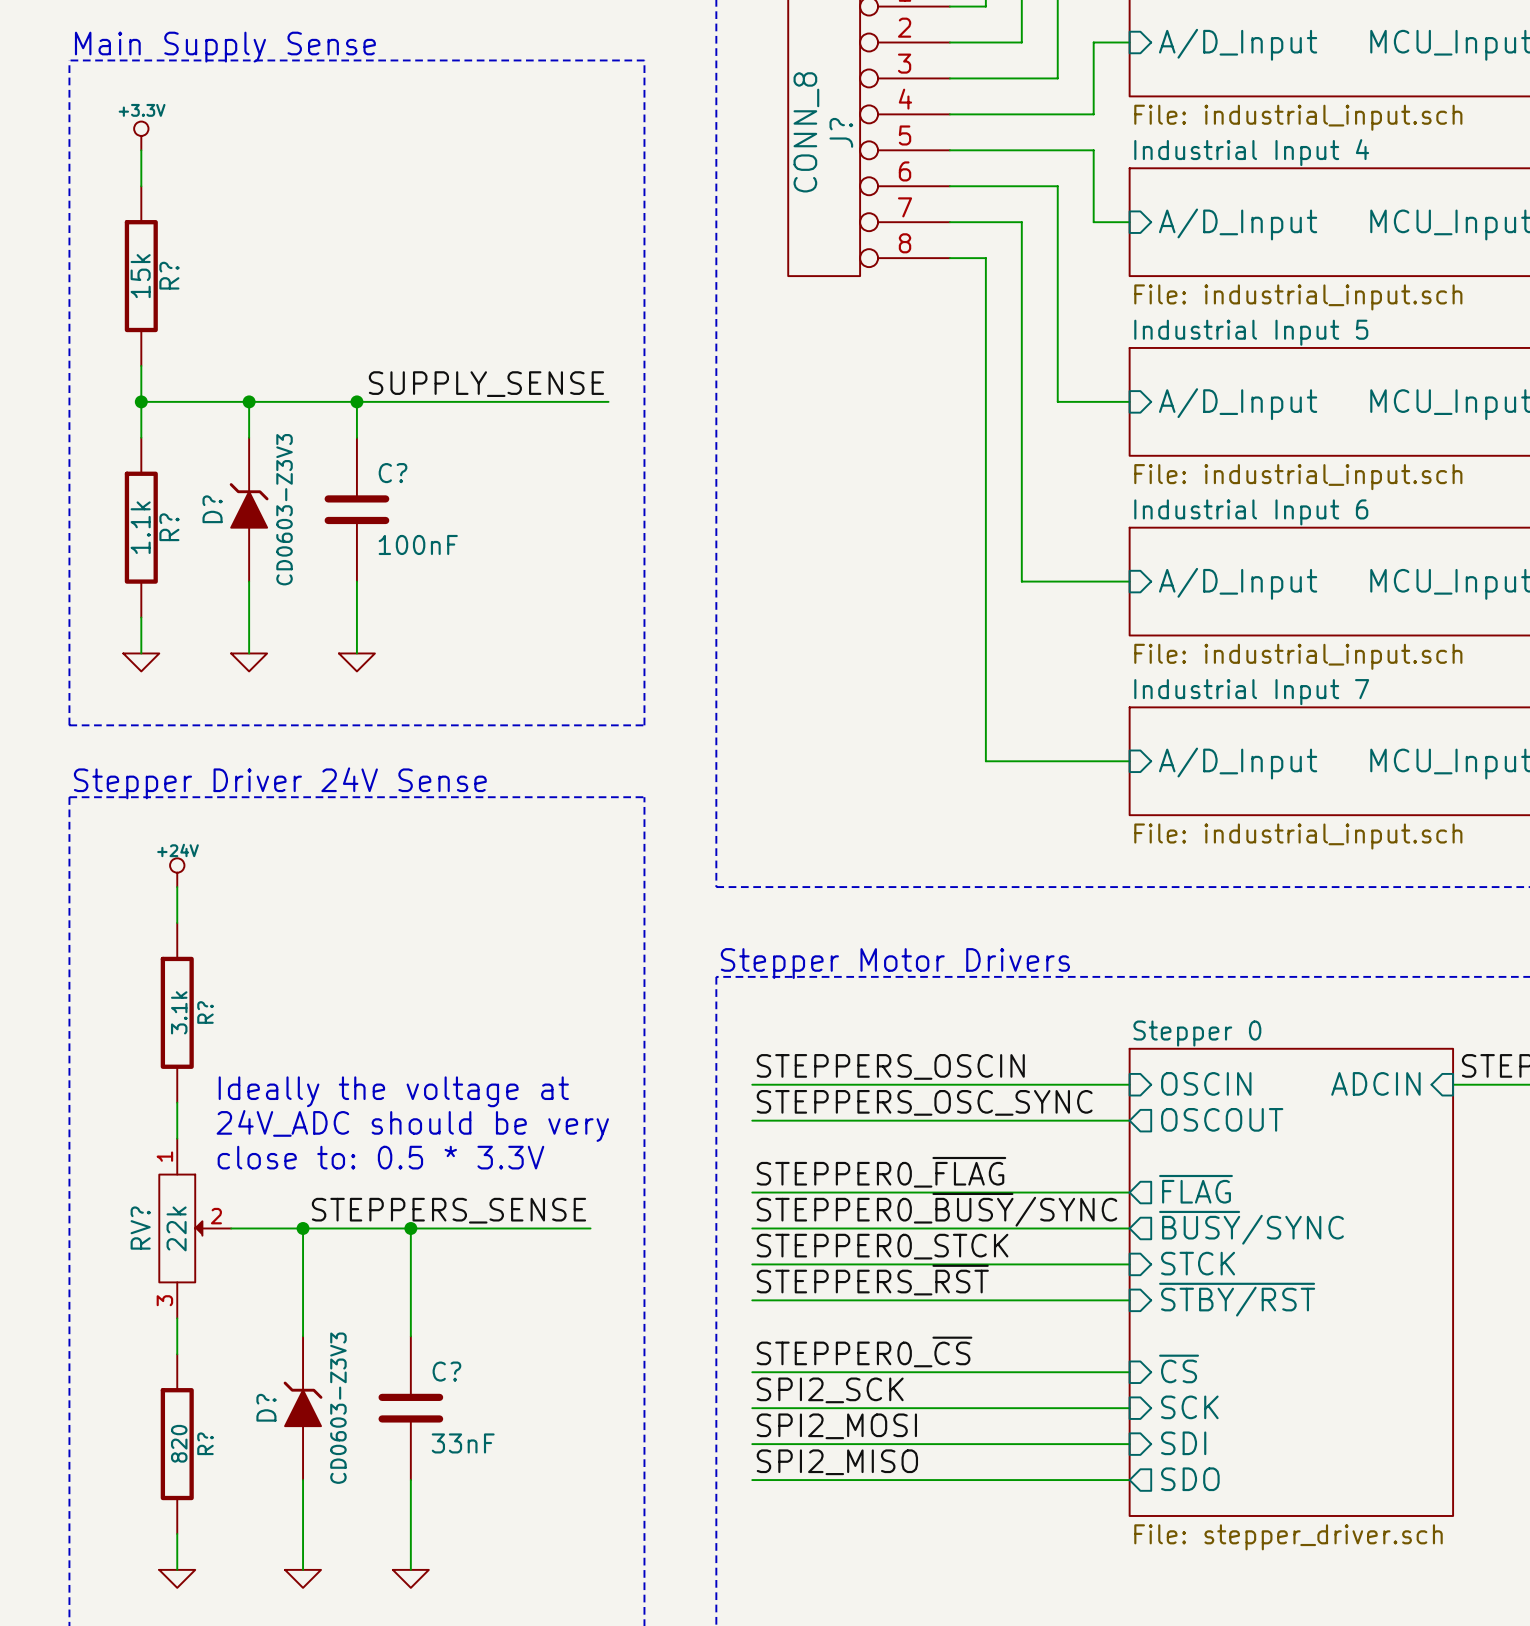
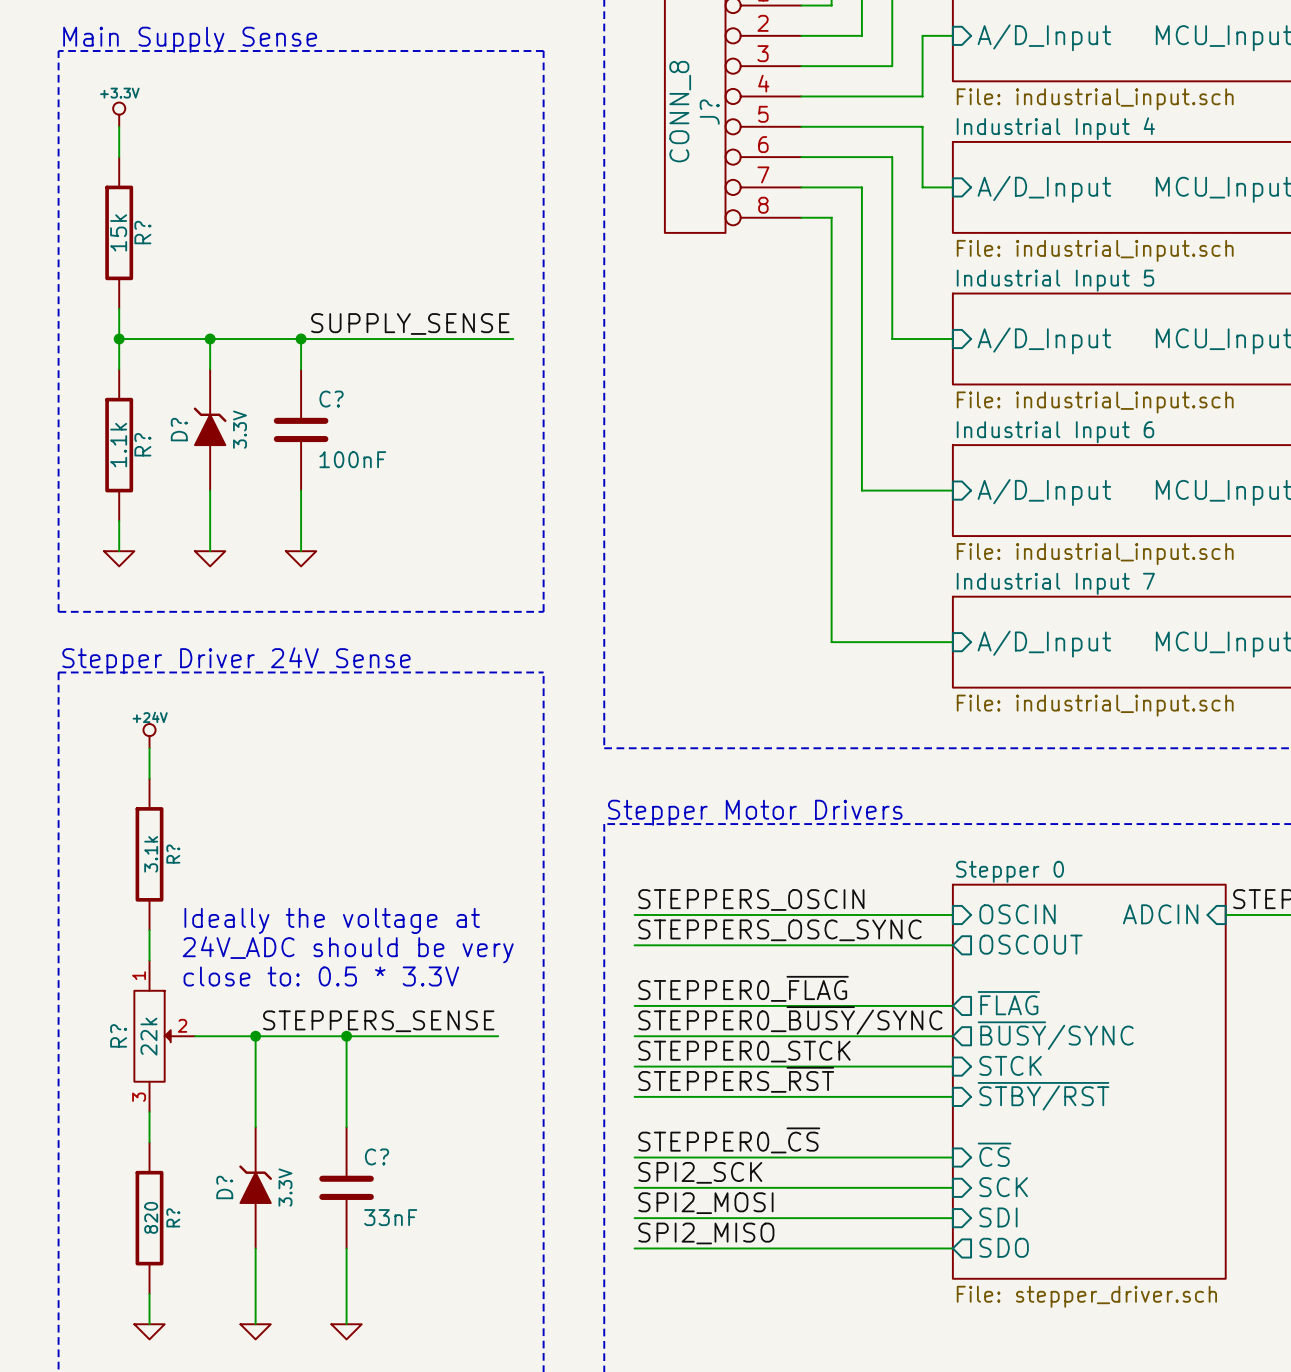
D? value: CD0603-Z3V3 (284, 509) -> 3.3V (240, 429)
RV? name: RV? (140, 1228) -> R? (118, 1035)
D? value: CD0603-Z3V3 (338, 1408) -> 3.3V (285, 1187)

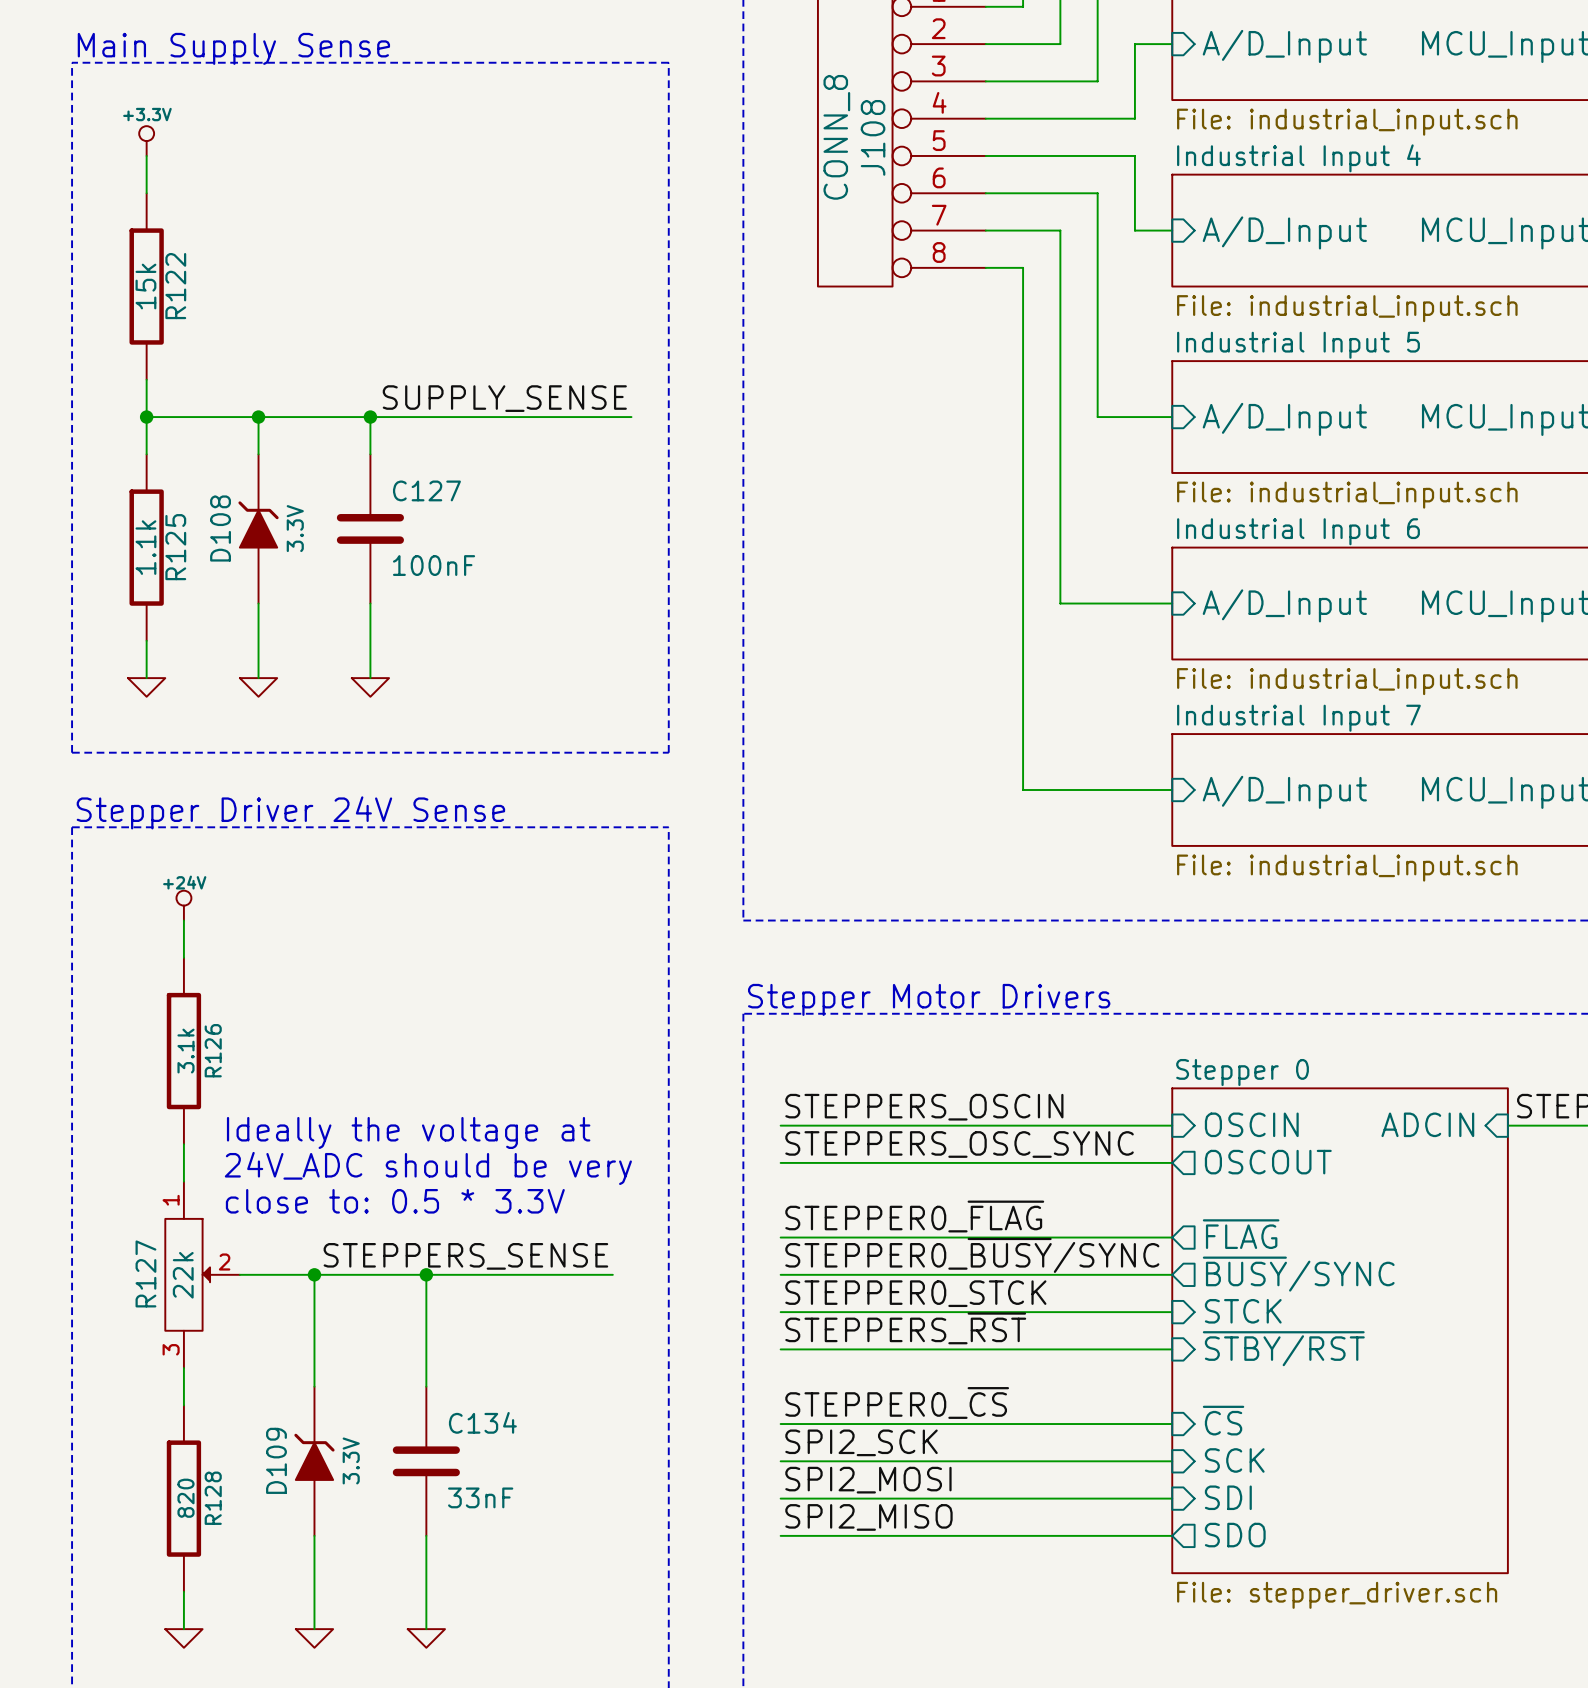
J? name: J? (709, 112) -> J108 (873, 137)
R? name: R? (142, 232) -> R122 (175, 286)
C? name: C? (331, 399) -> C127 (426, 490)
D? name: D? (179, 429) -> D108 (220, 528)
R? name: R? (142, 444) -> R125 (175, 547)
R? name: R? (173, 854) -> R126 (213, 1050)
R? name: R? (118, 1035) -> R127 (145, 1273)
C? name: C? (377, 1156) -> C134 (482, 1422)
D? name: D? (224, 1187) -> D109 (276, 1460)
R? name: R? (173, 1217) -> R128 (213, 1498)

